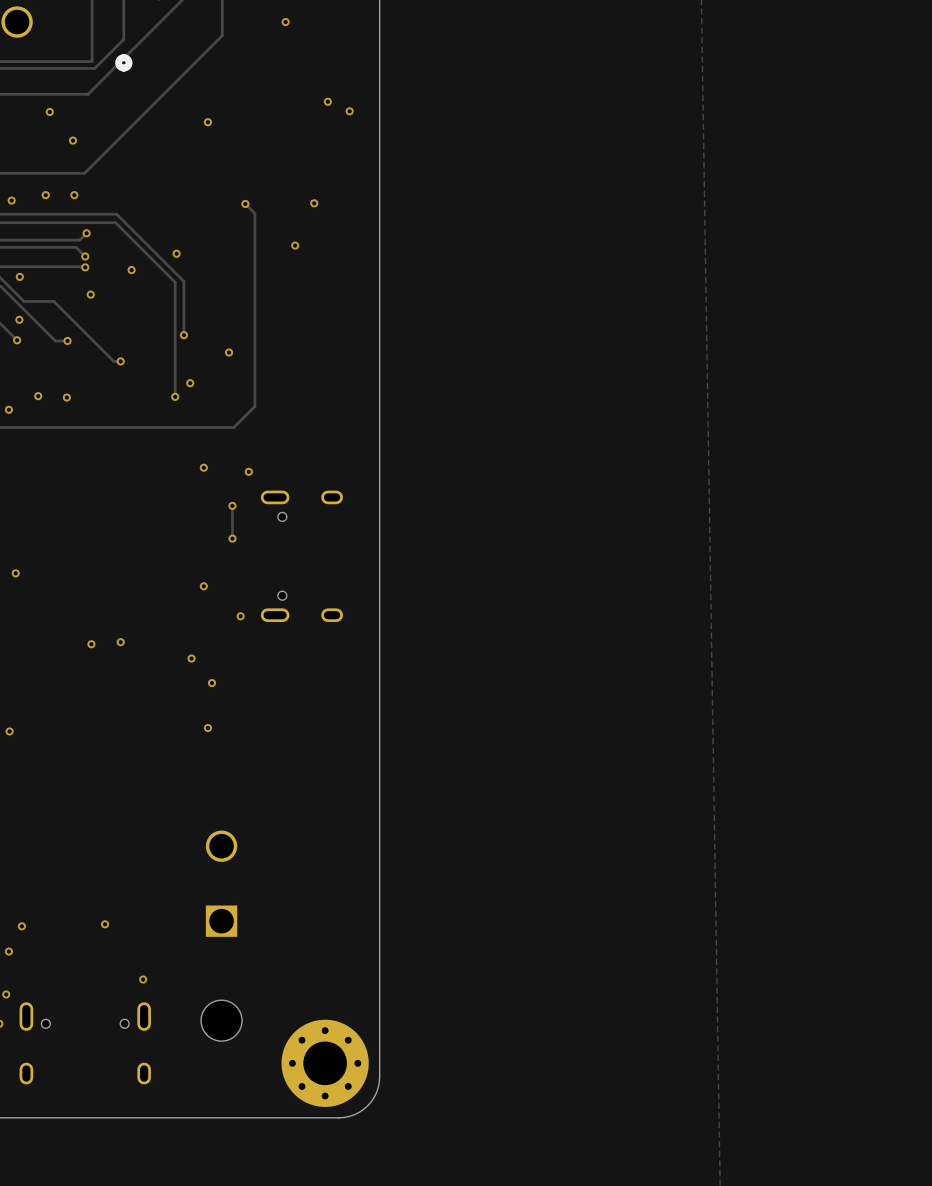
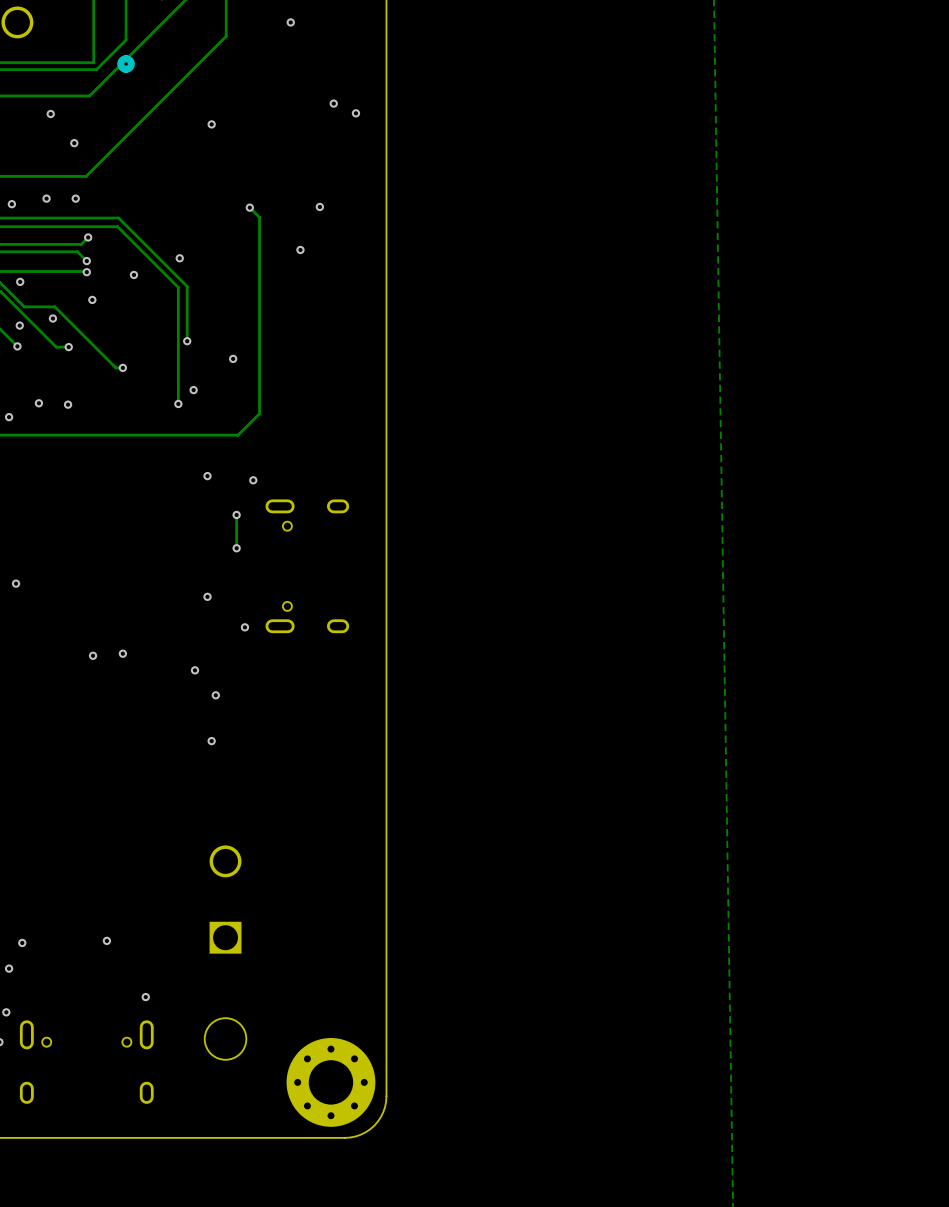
via: none -> (52, 318)
via: (9, 731) -> none

